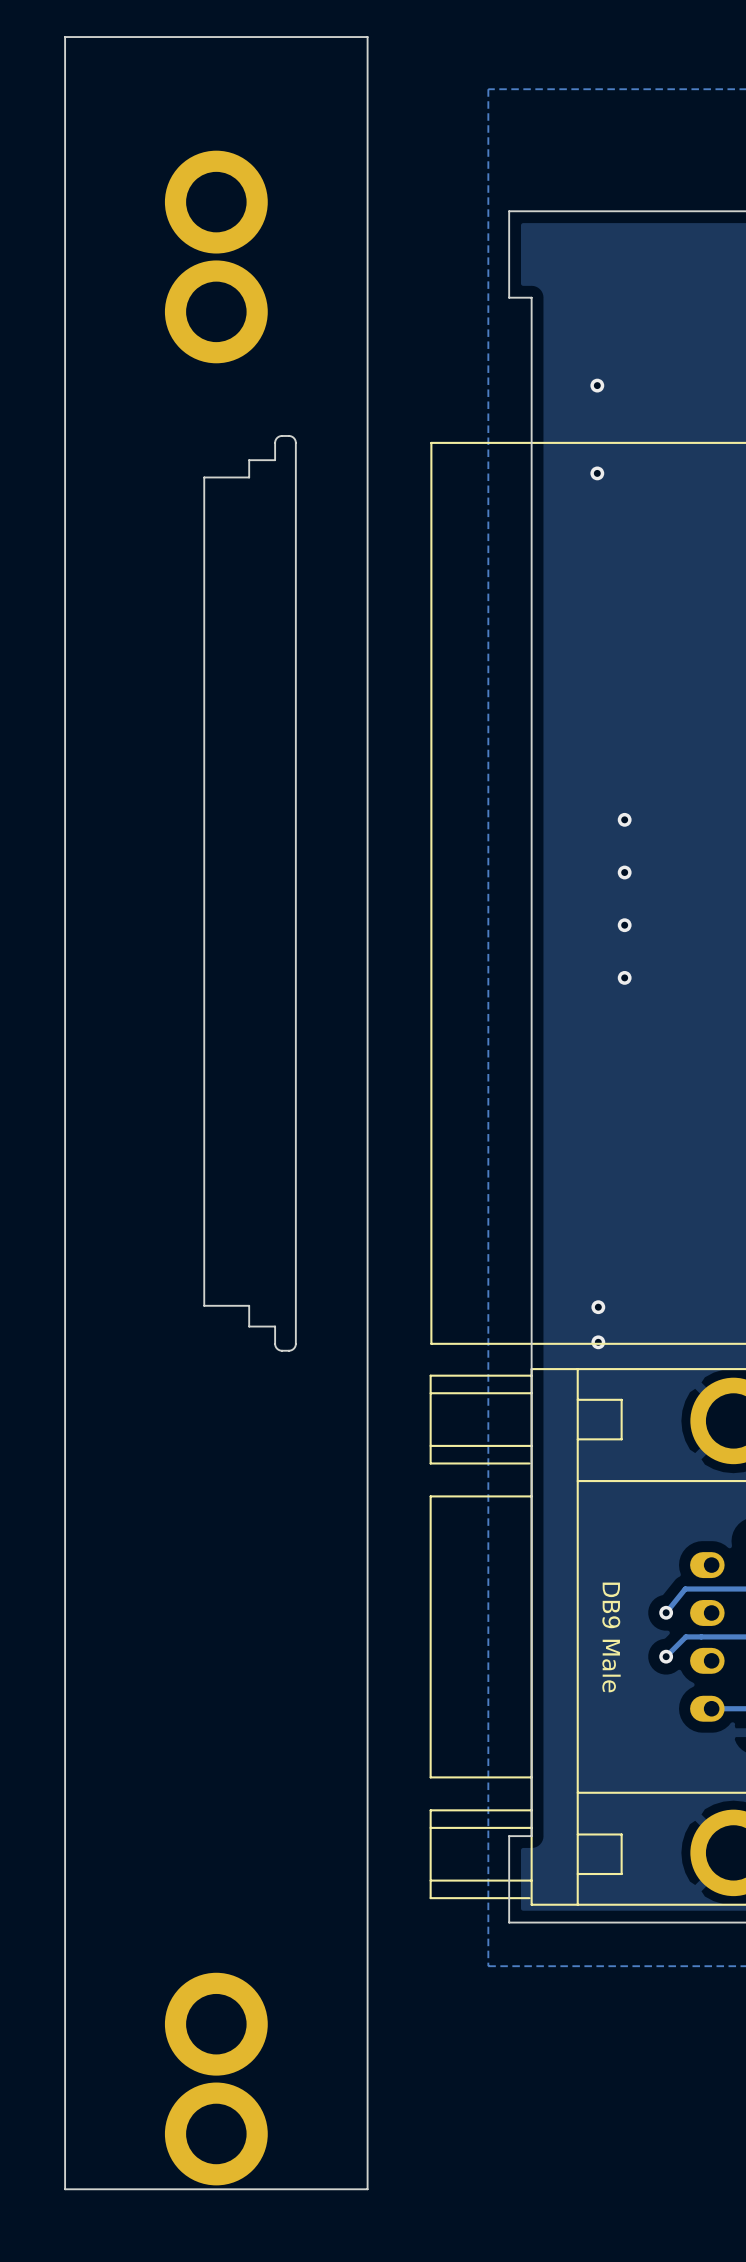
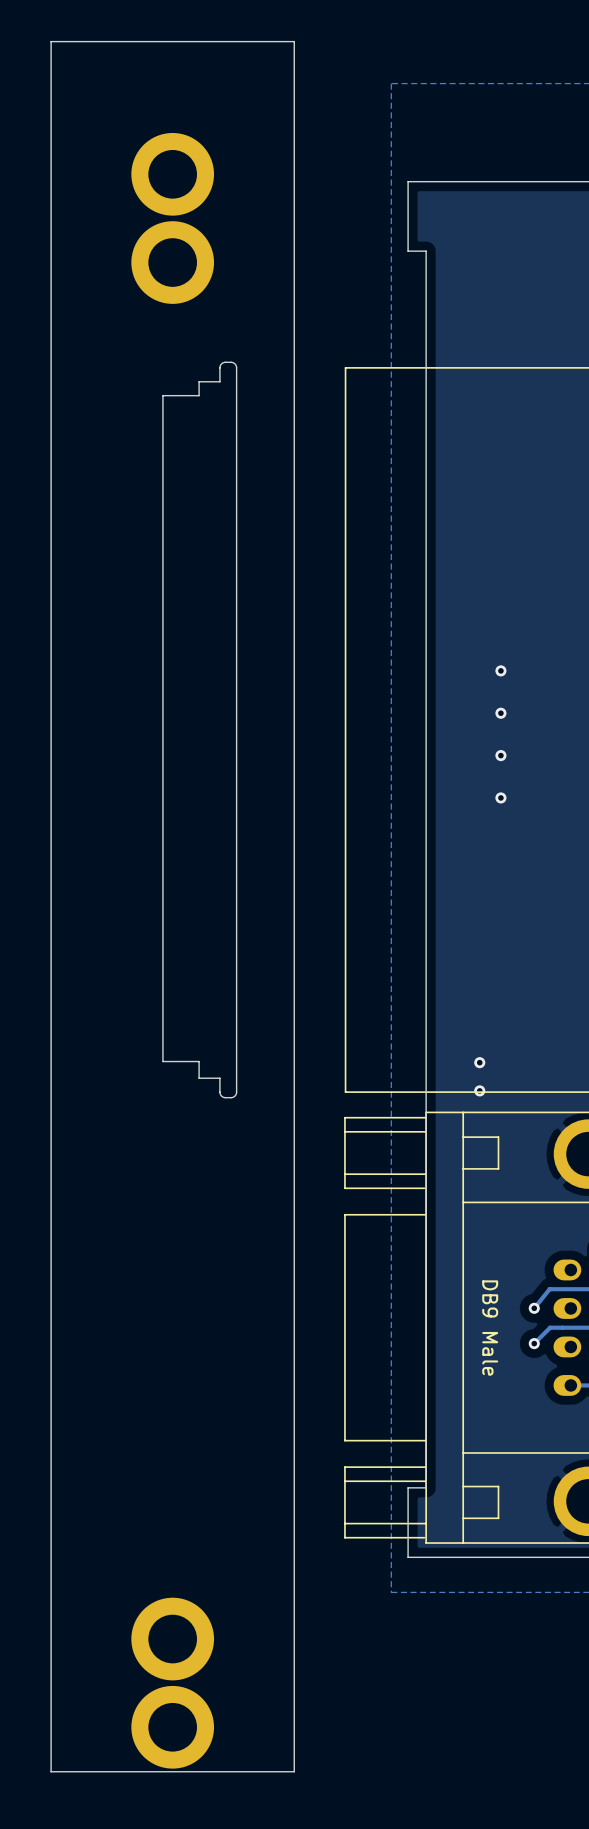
via: (597, 385) -> none
via: (597, 473) -> none

